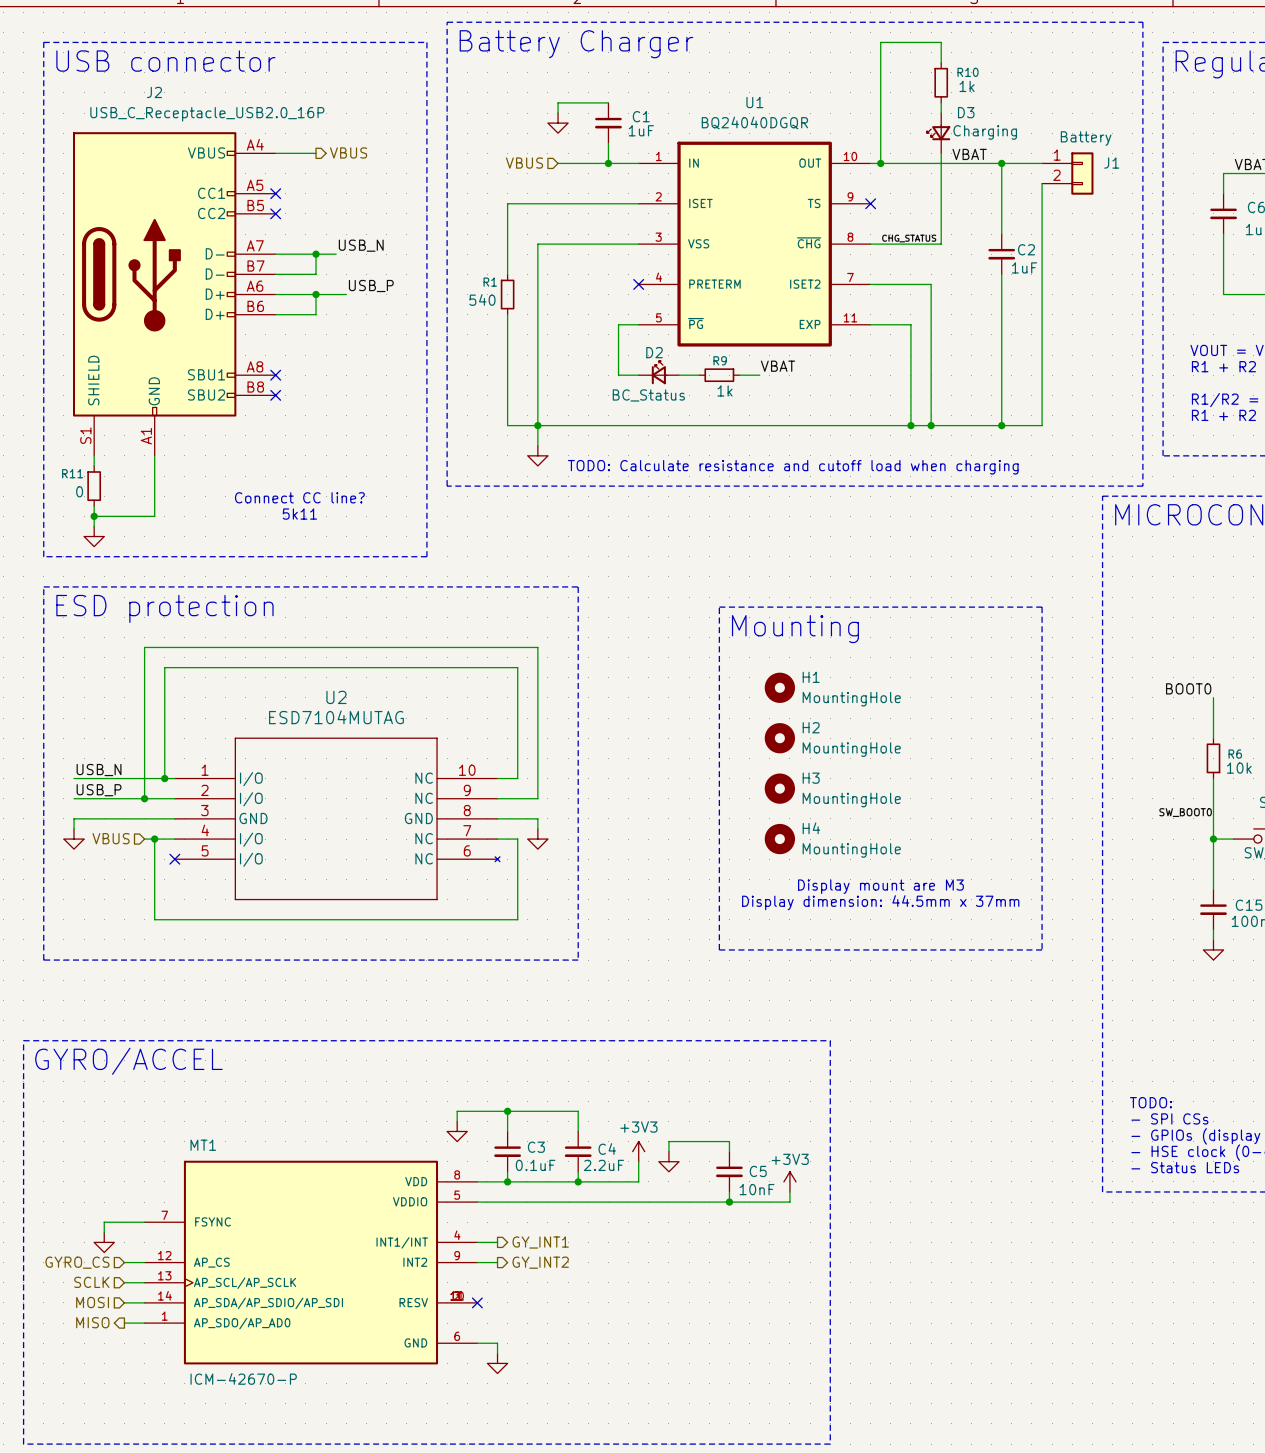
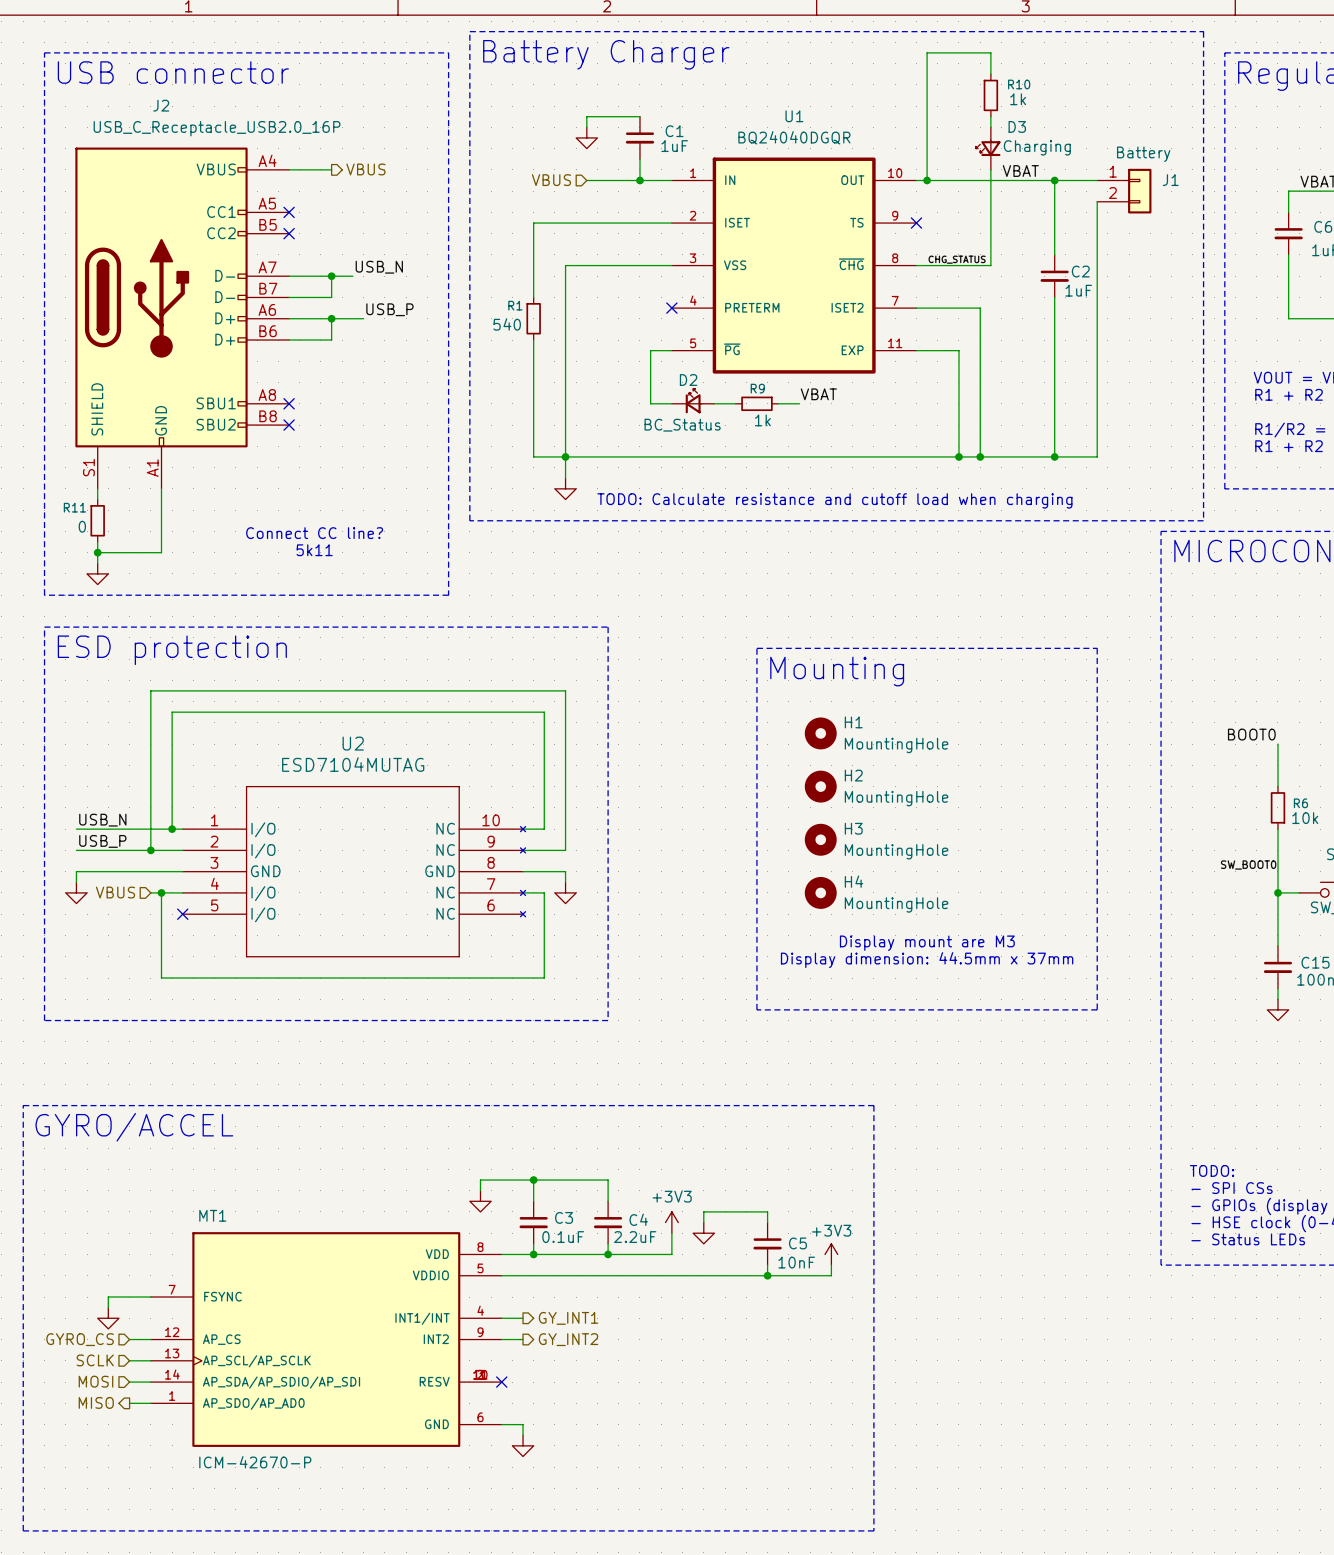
U2 symbol: [174, 737, 500, 901] -> [182, 786, 526, 958]

